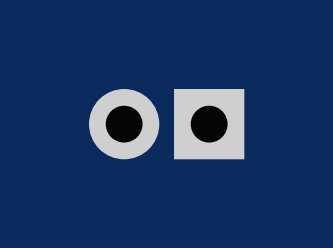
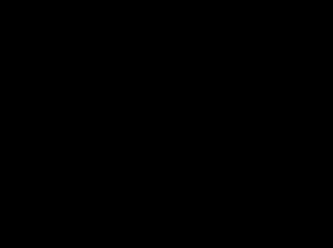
part: (166, 124) -> none

